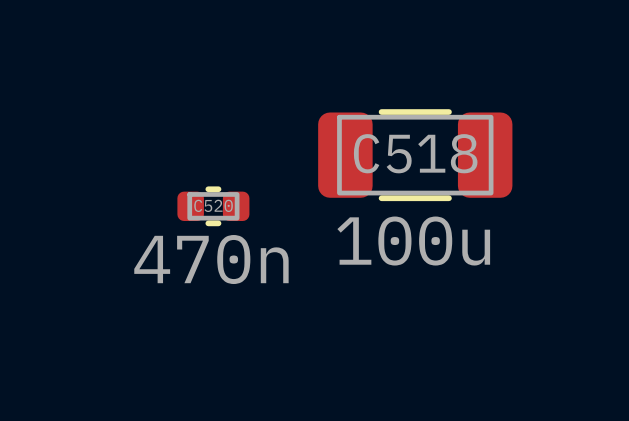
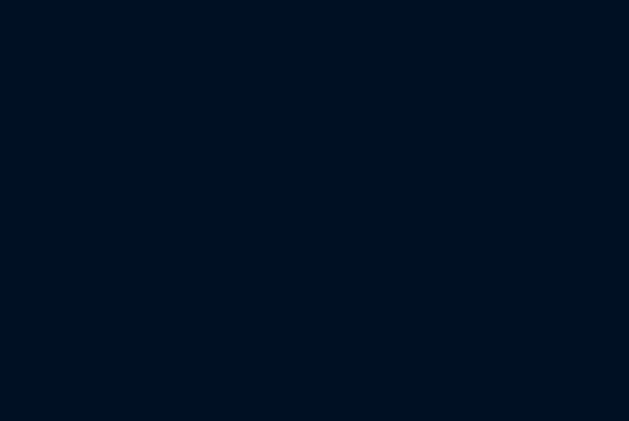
C518: 100u (415, 155) -> none
C520: 470n (213, 206) -> none

